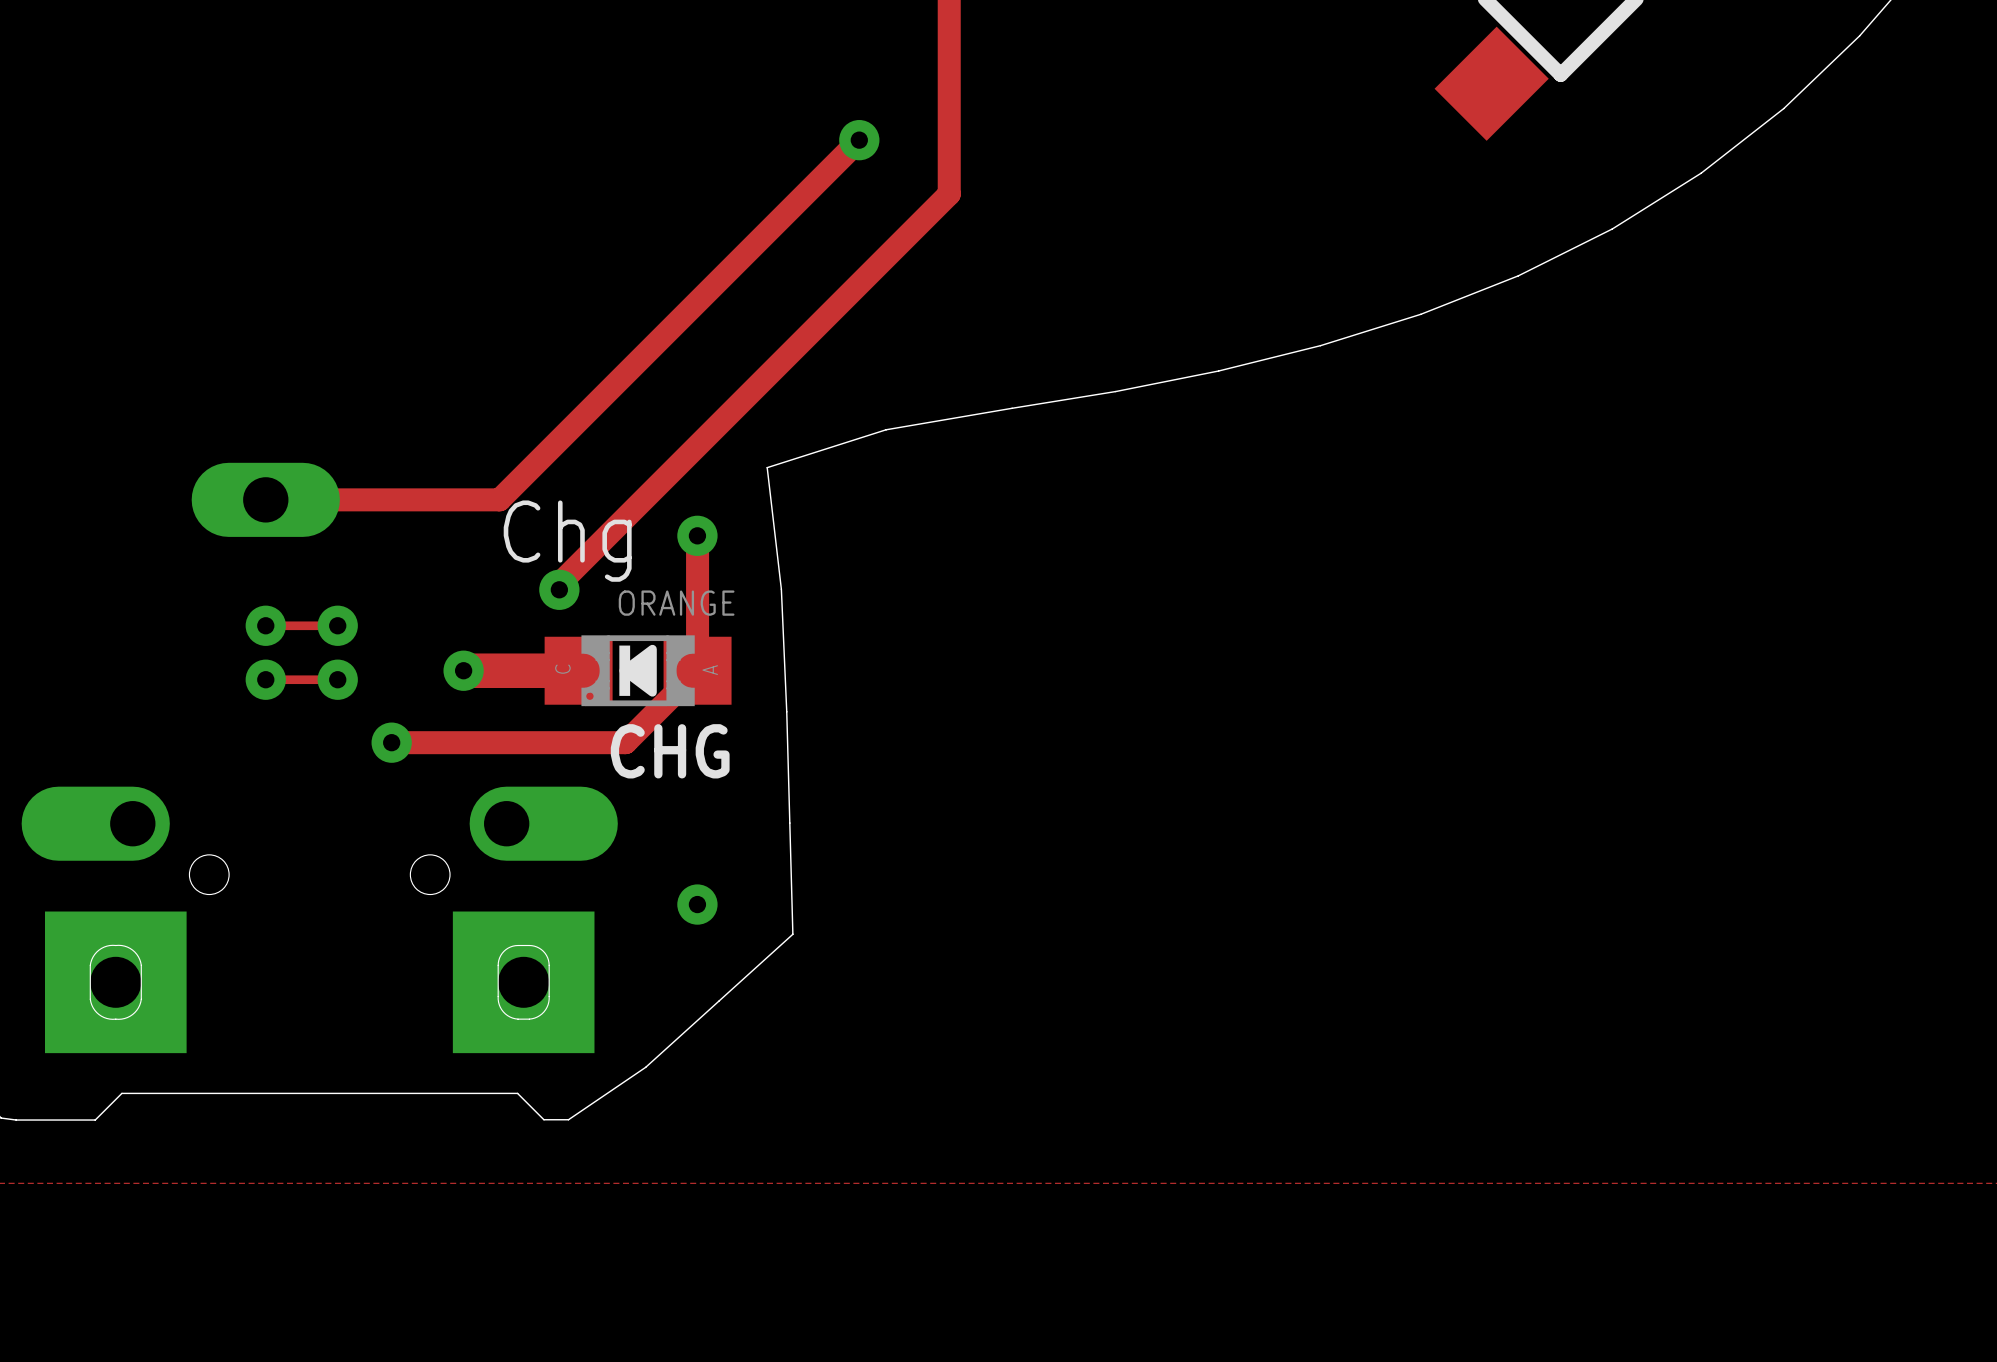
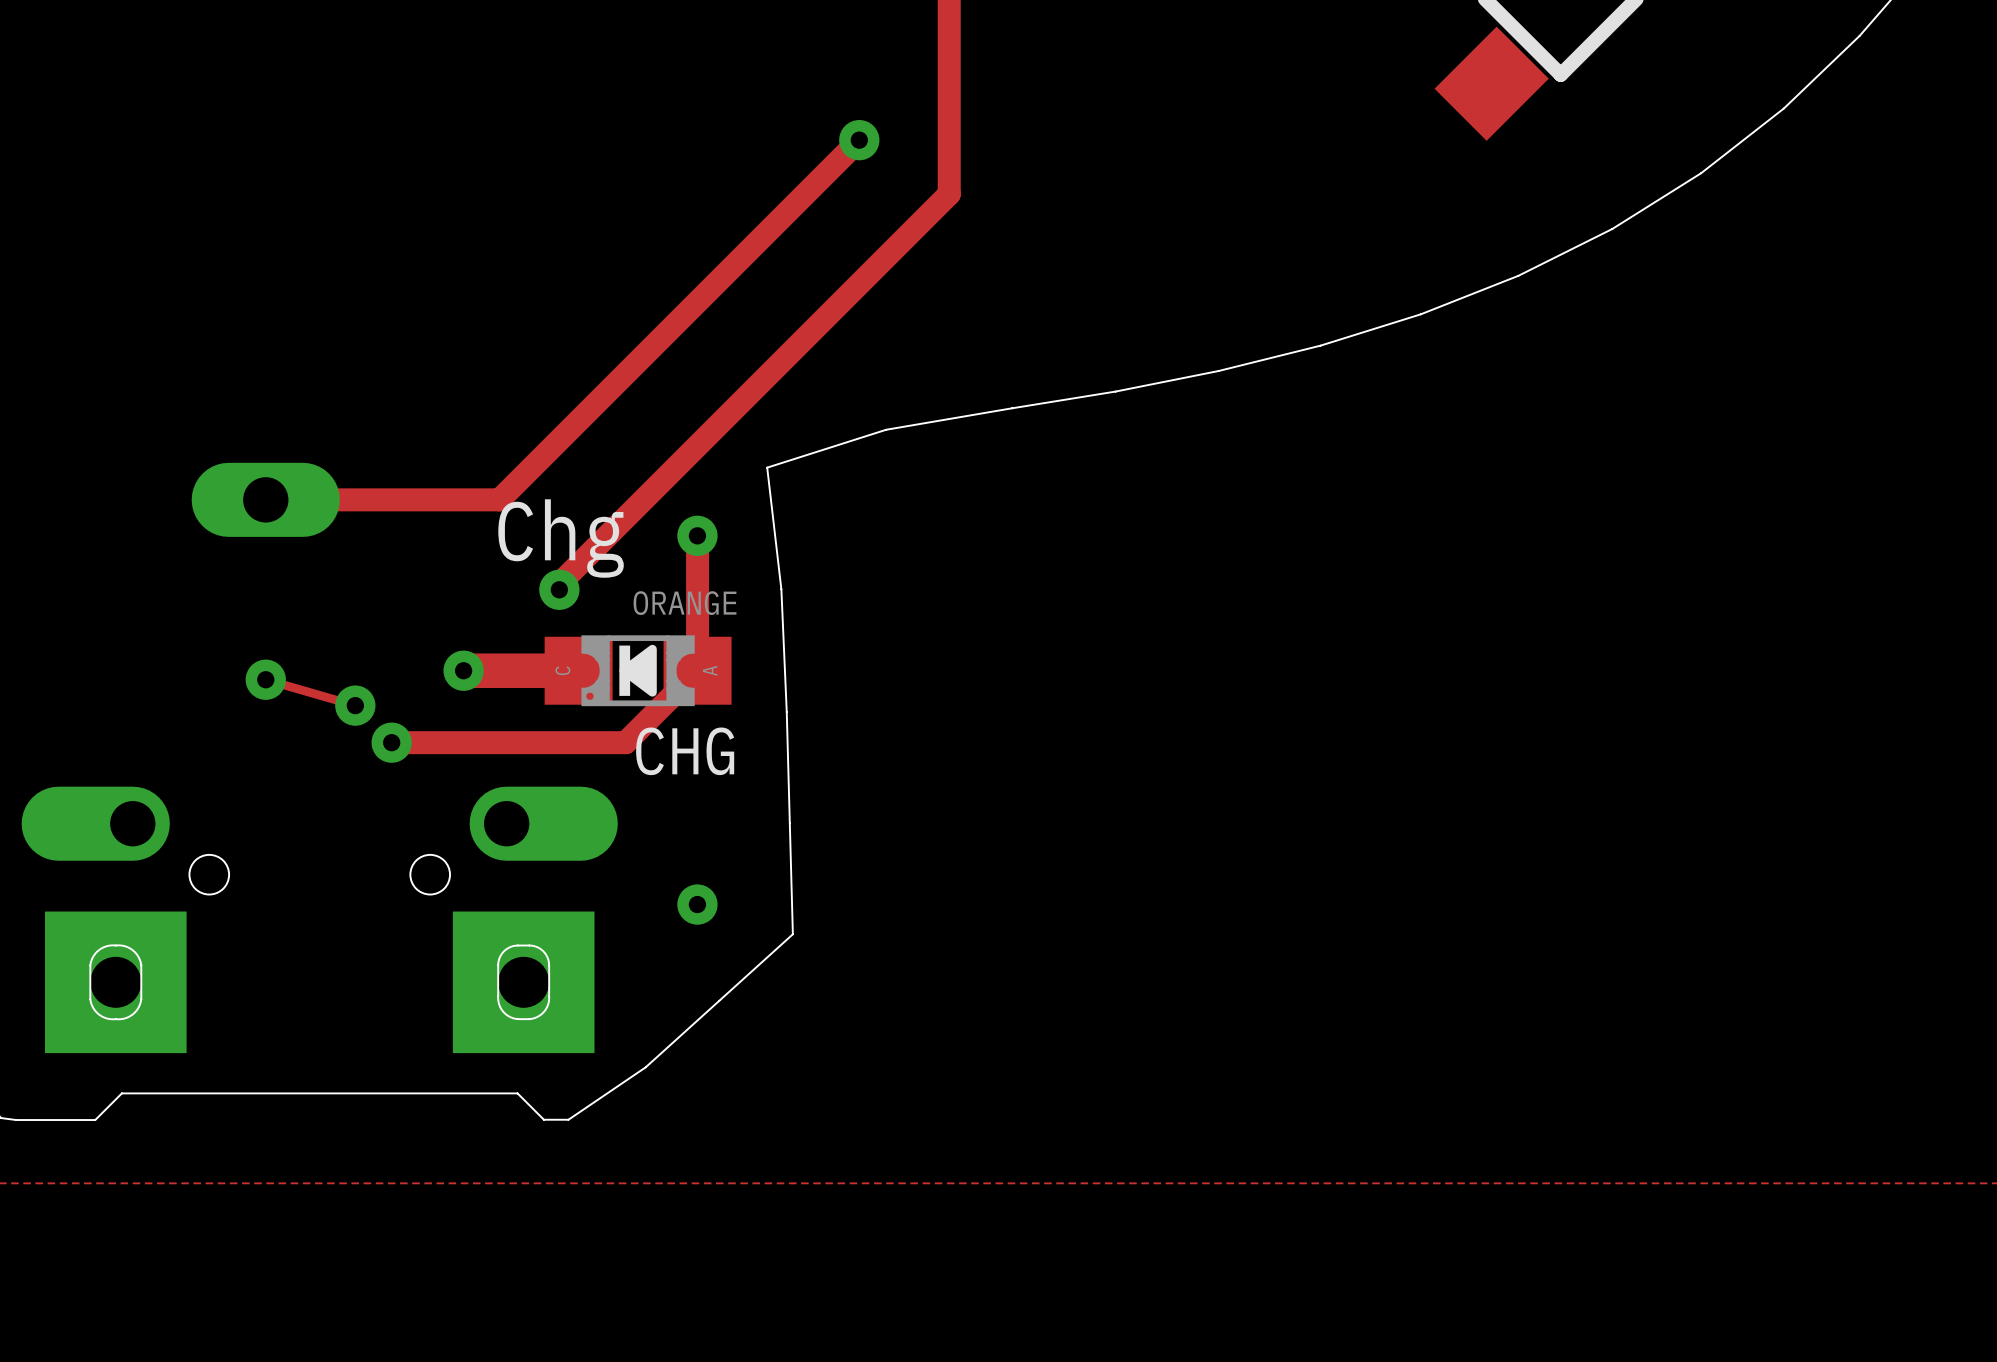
track: (265, 625) (337, 625) -> none
via: (265, 625) -> none
via: (337, 625) -> none
track: (265, 679) (337, 679) -> (265, 679) (355, 705)
via position: (337, 679) -> (355, 705)

